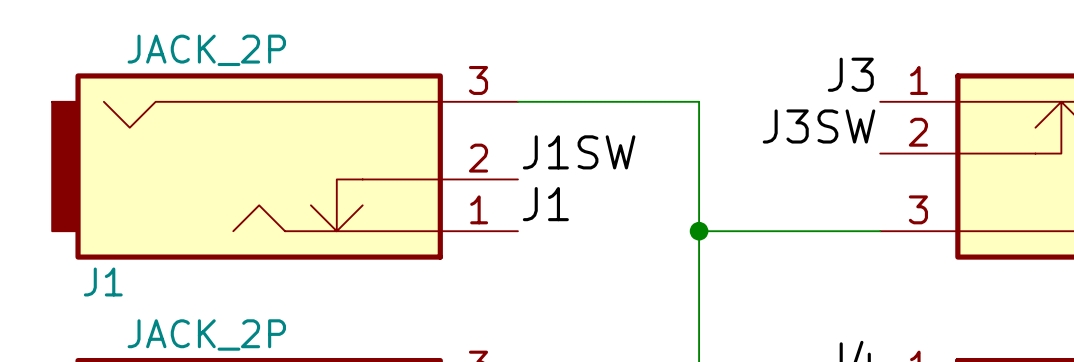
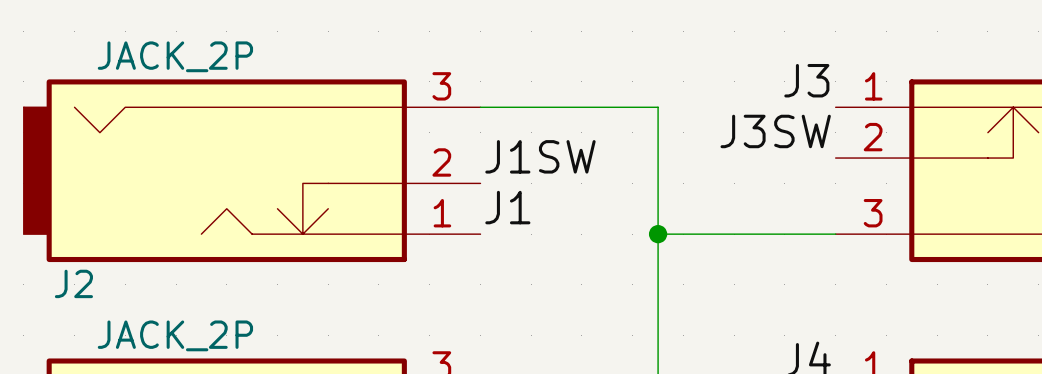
J1 name: J1 (103, 281) -> J2 (73, 283)

